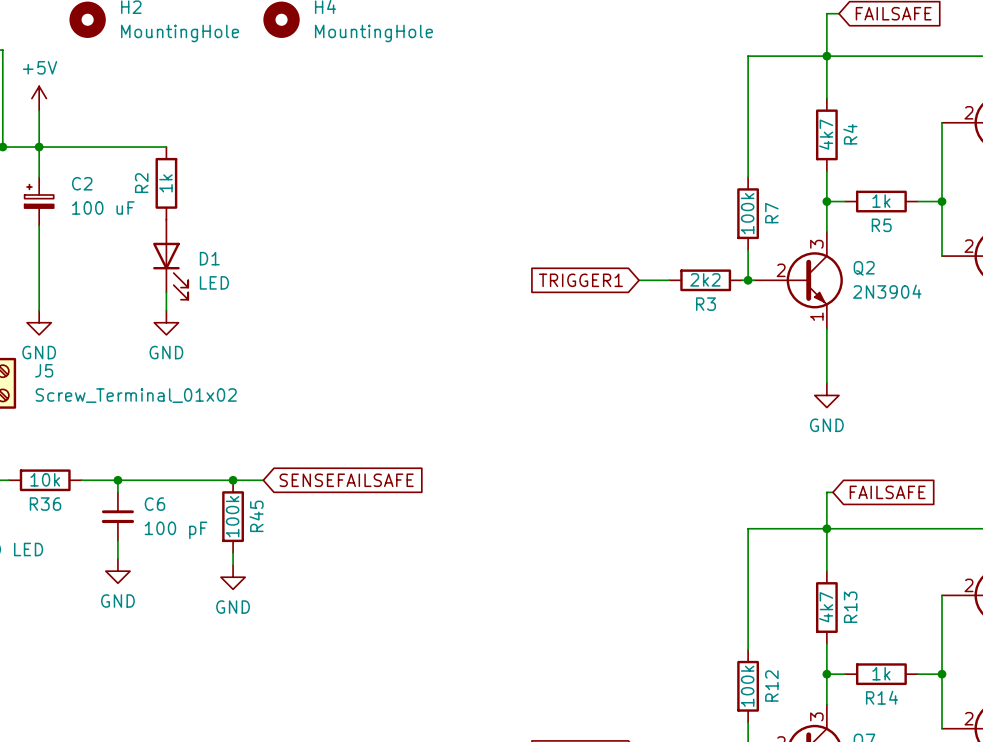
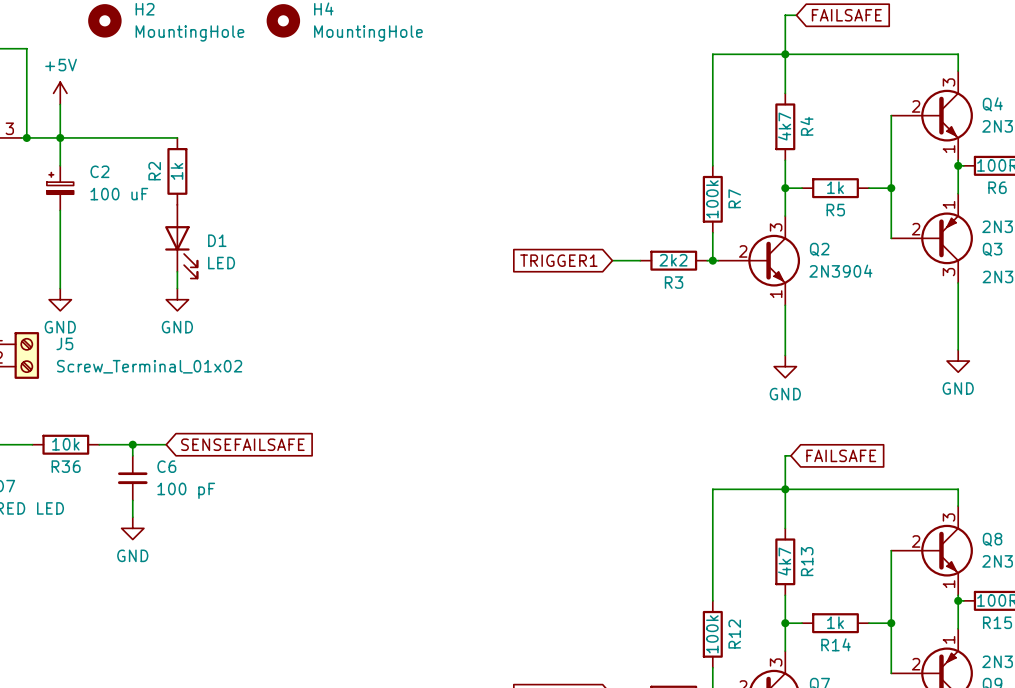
wire: (154, 480) (263, 480) -> none
junction: (233, 480) -> none
global label position: SENSEFAILSAFE (346, 480) -> SENSEFAILSAFE (242, 444)
R45: 100k (233, 516) -> none
wire: (233, 552) (233, 565) -> none
power symbol: GND (233, 577) -> none

